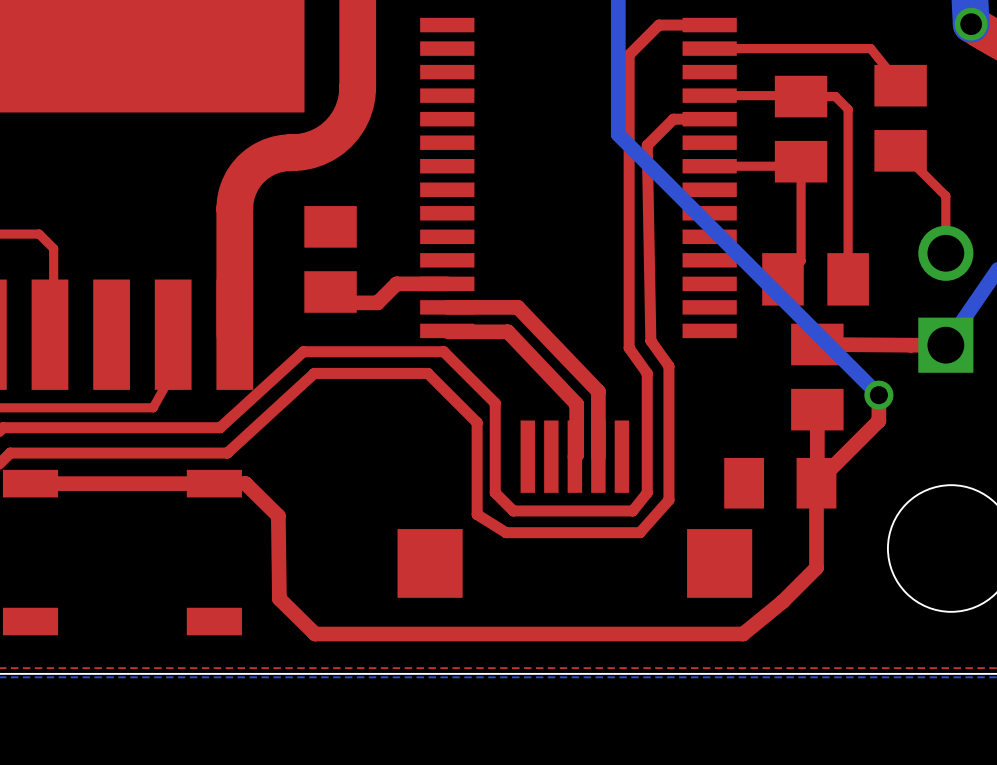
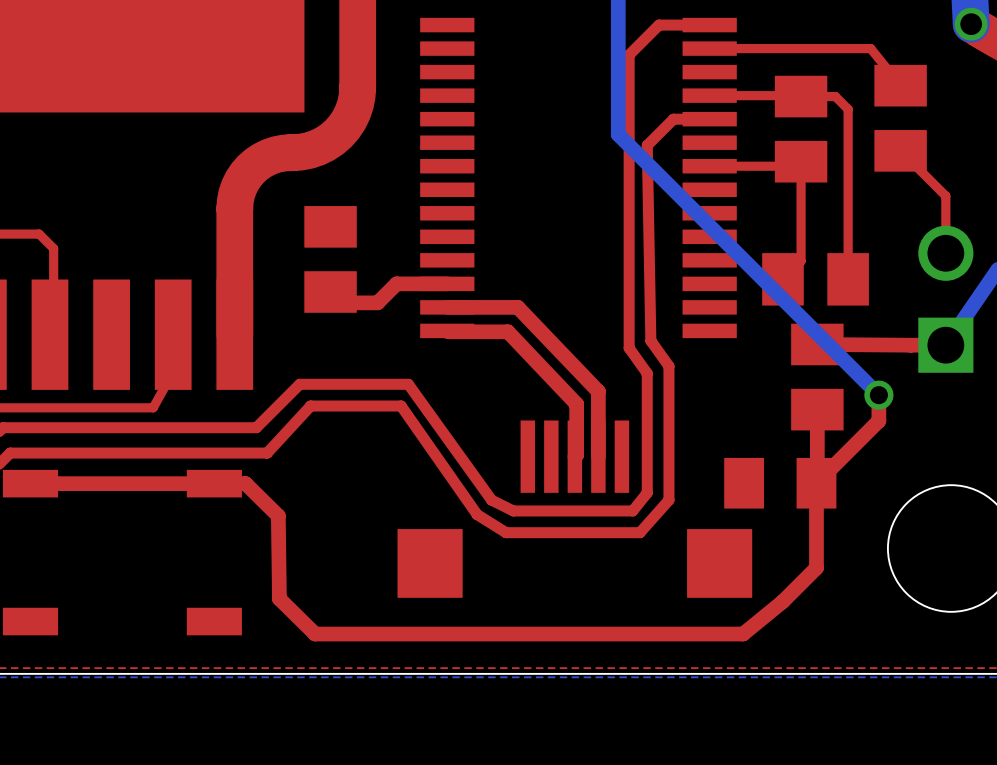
top track: (220, 427) (303, 351) (443, 351) (495, 403) (495, 492) (513, 510) -> (220, 427) (256, 427) (299, 384) (408, 384) (491, 500) (513, 510)
top track: (227, 453) (314, 373) (427, 373) (477, 422) (477, 514) -> (227, 453) (267, 453) (310, 406) (401, 406) (477, 514)

